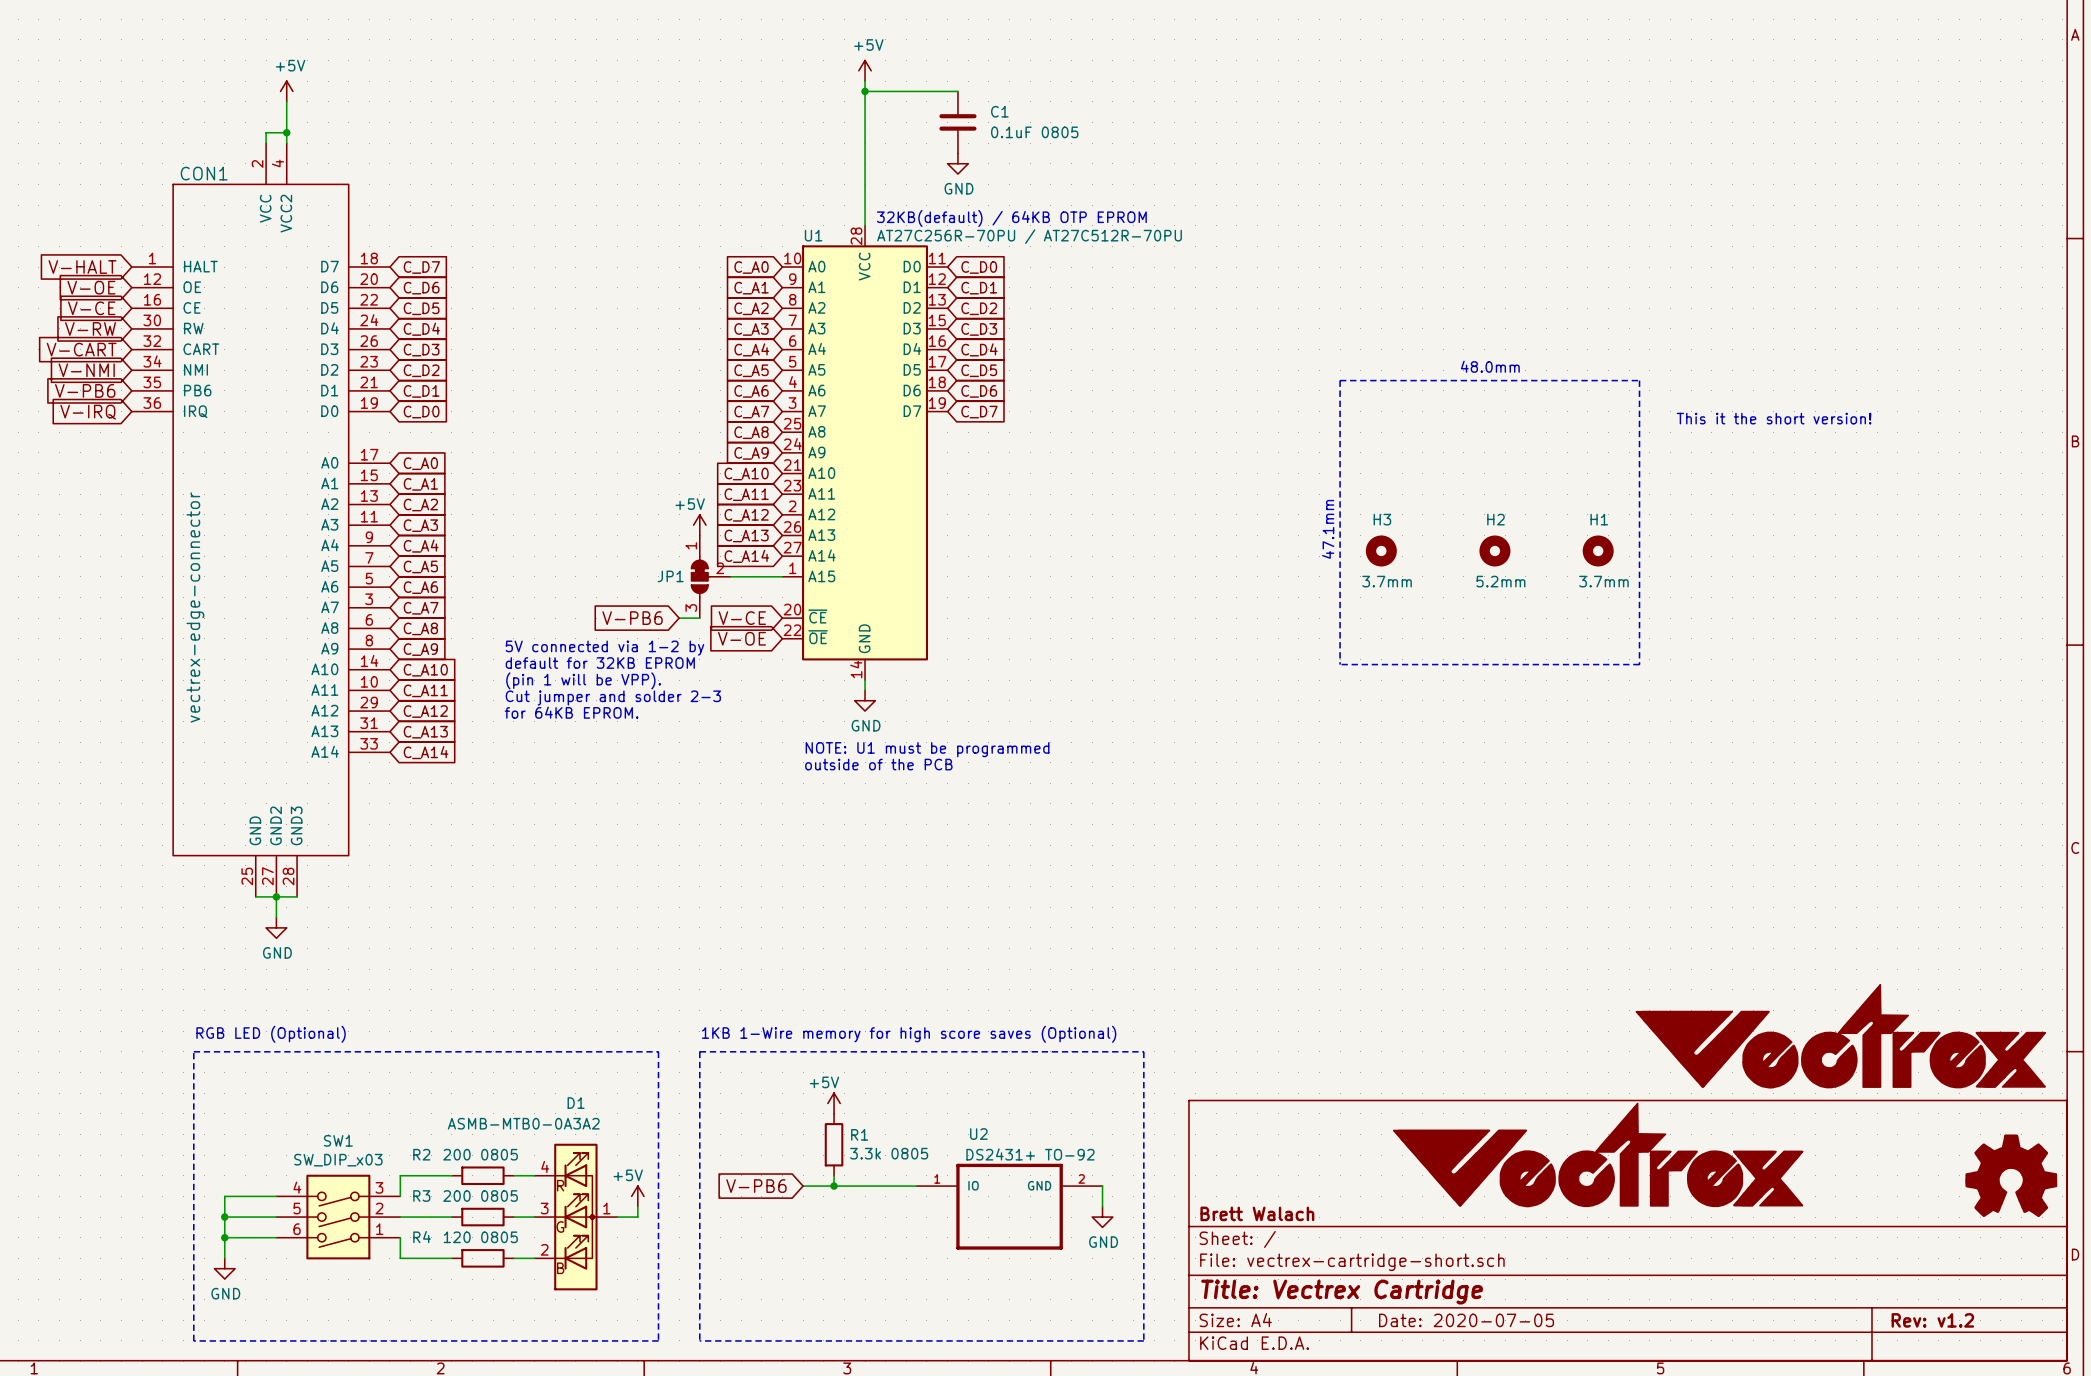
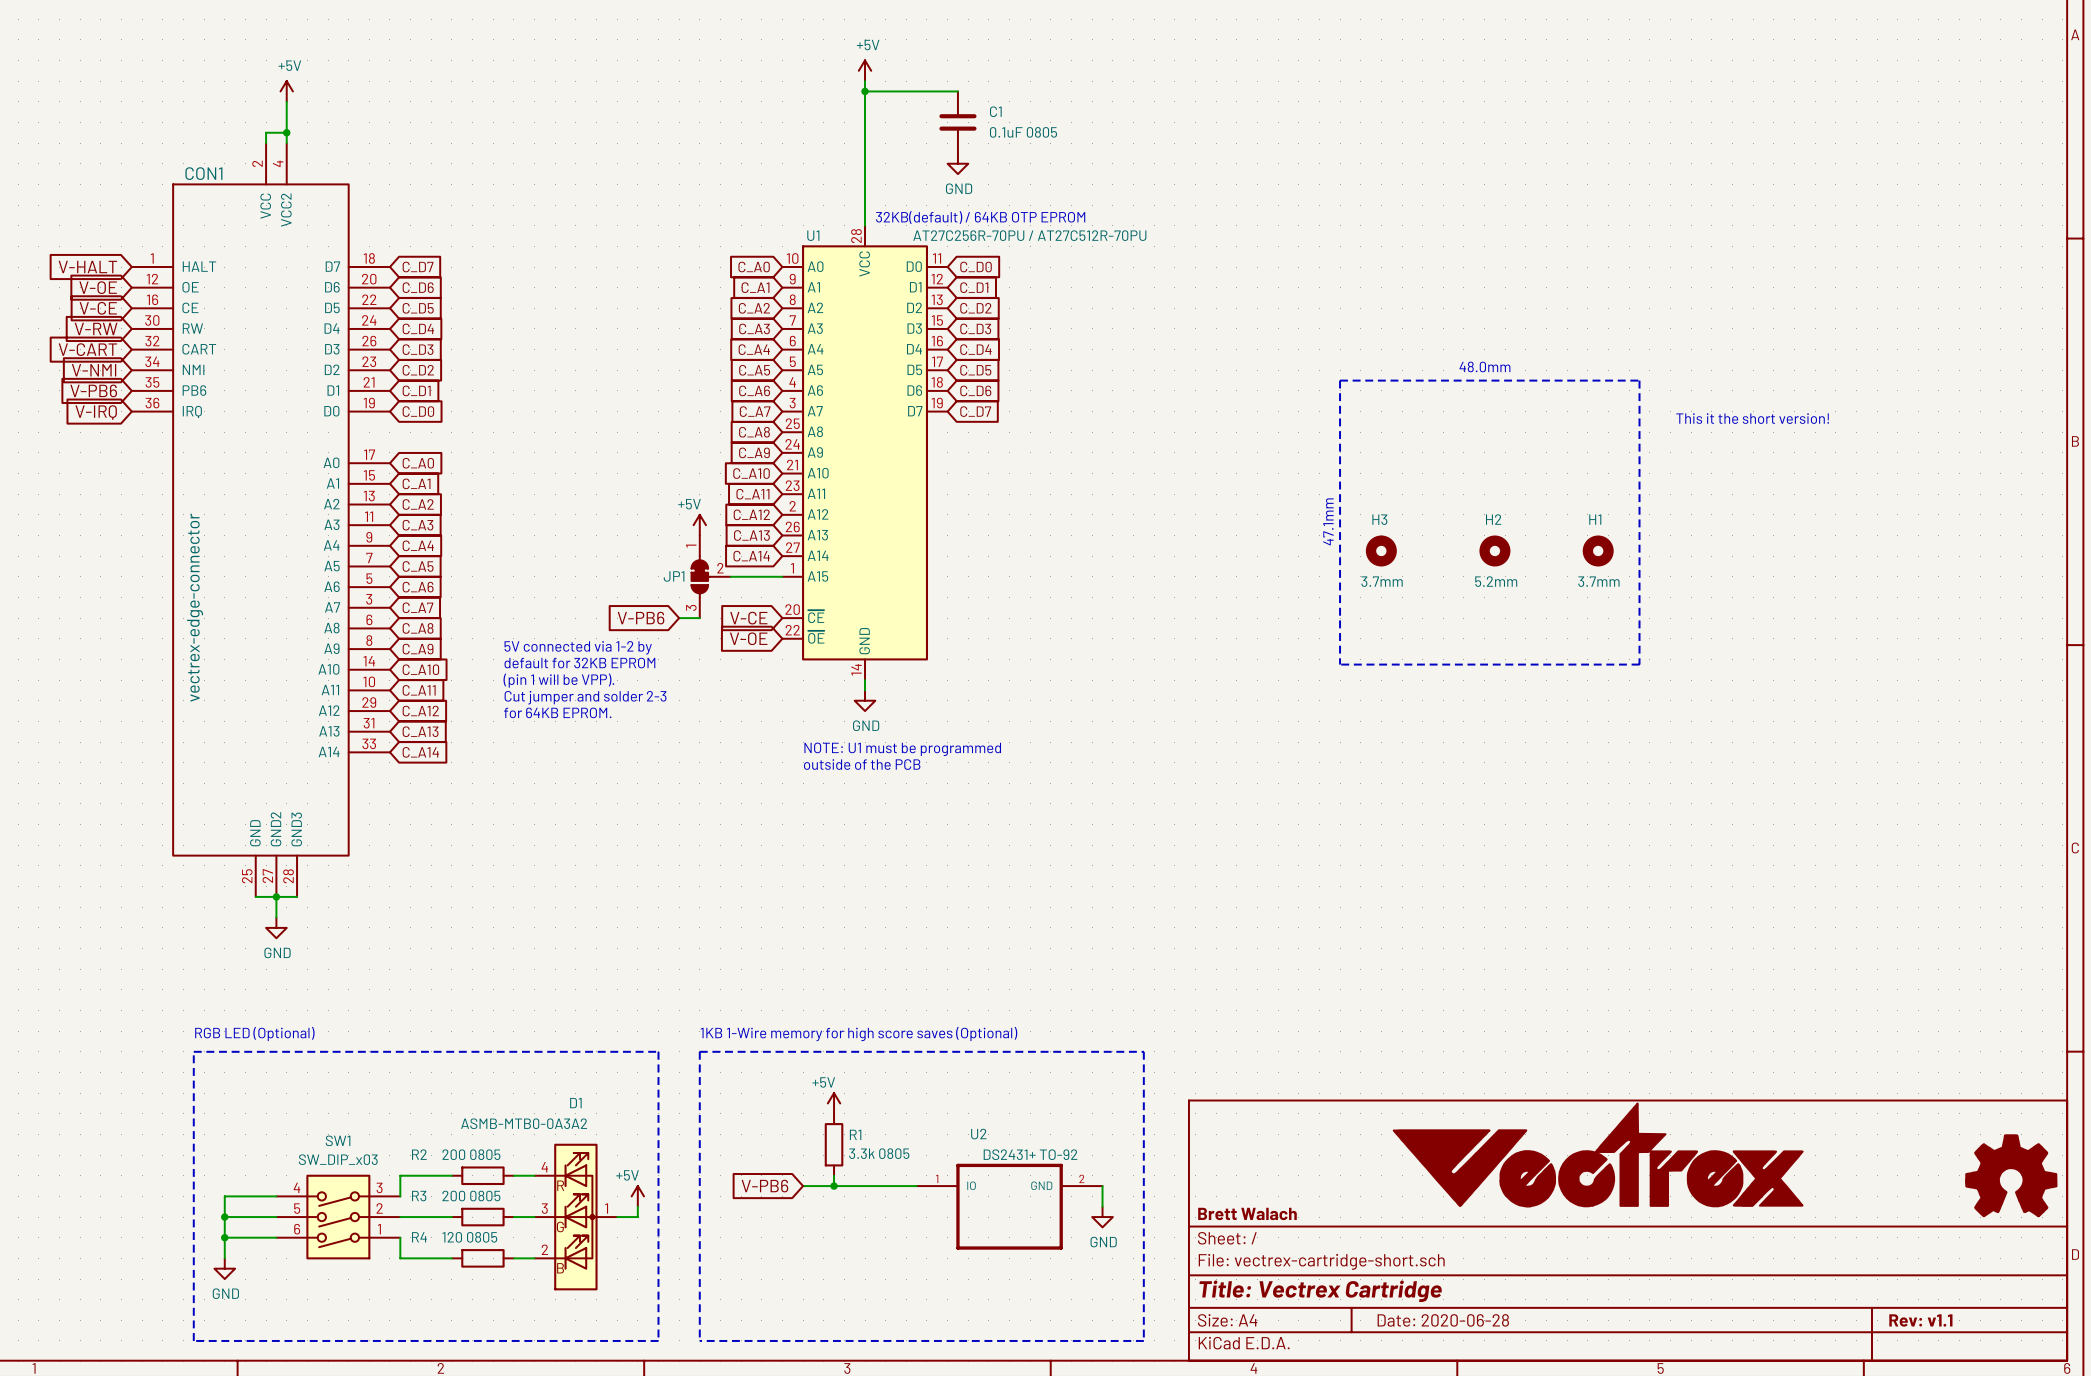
part: (1840, 1036) -> none
title block: Date: 2020-07-05 (1466, 1320) -> Date: 2020-06-28 (1443, 1320)
title block: Rev: v1.2 (1932, 1320) -> Rev: v1.1 (1920, 1320)

